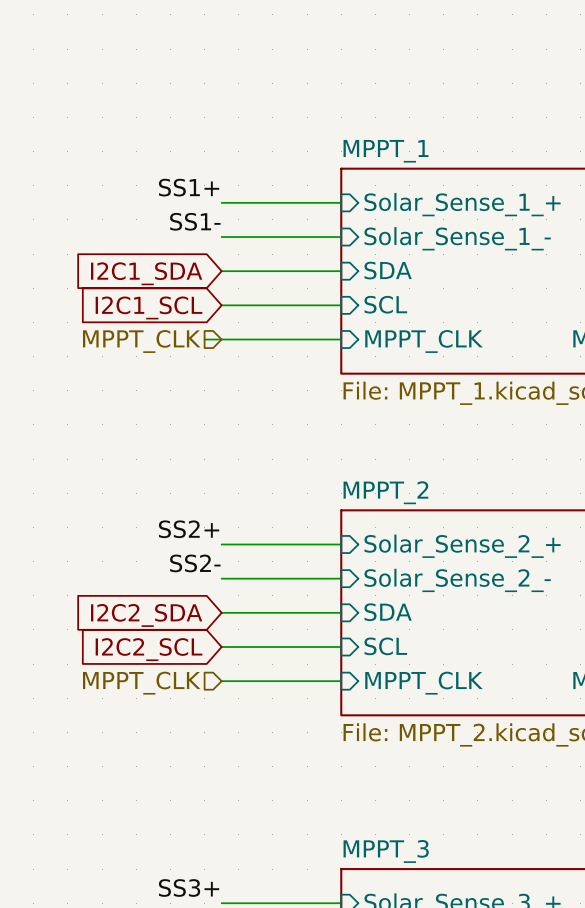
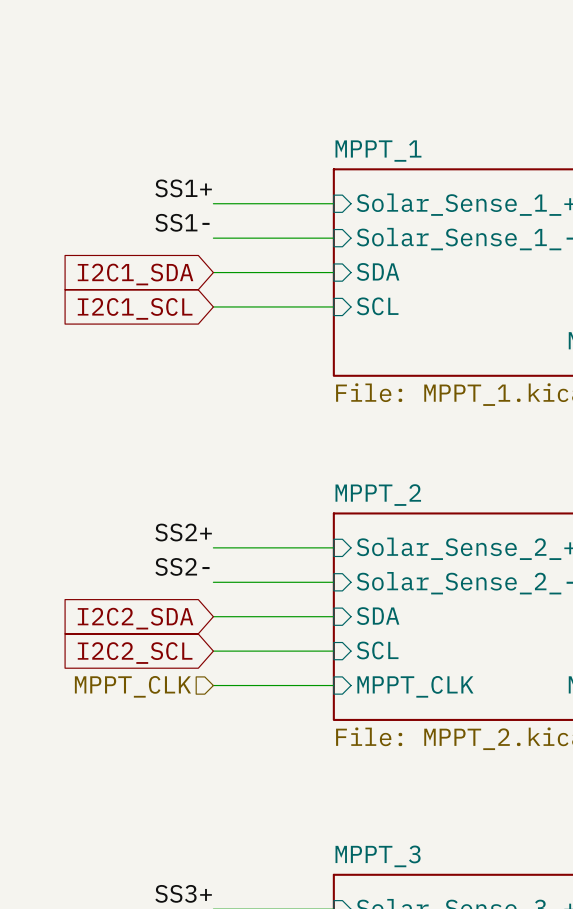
wire: (204, 339) (341, 339) -> none
hierarchical label: MPPT_CLK (141, 341) -> none
sheet pin: MPPT_CLK (423, 341) -> none

